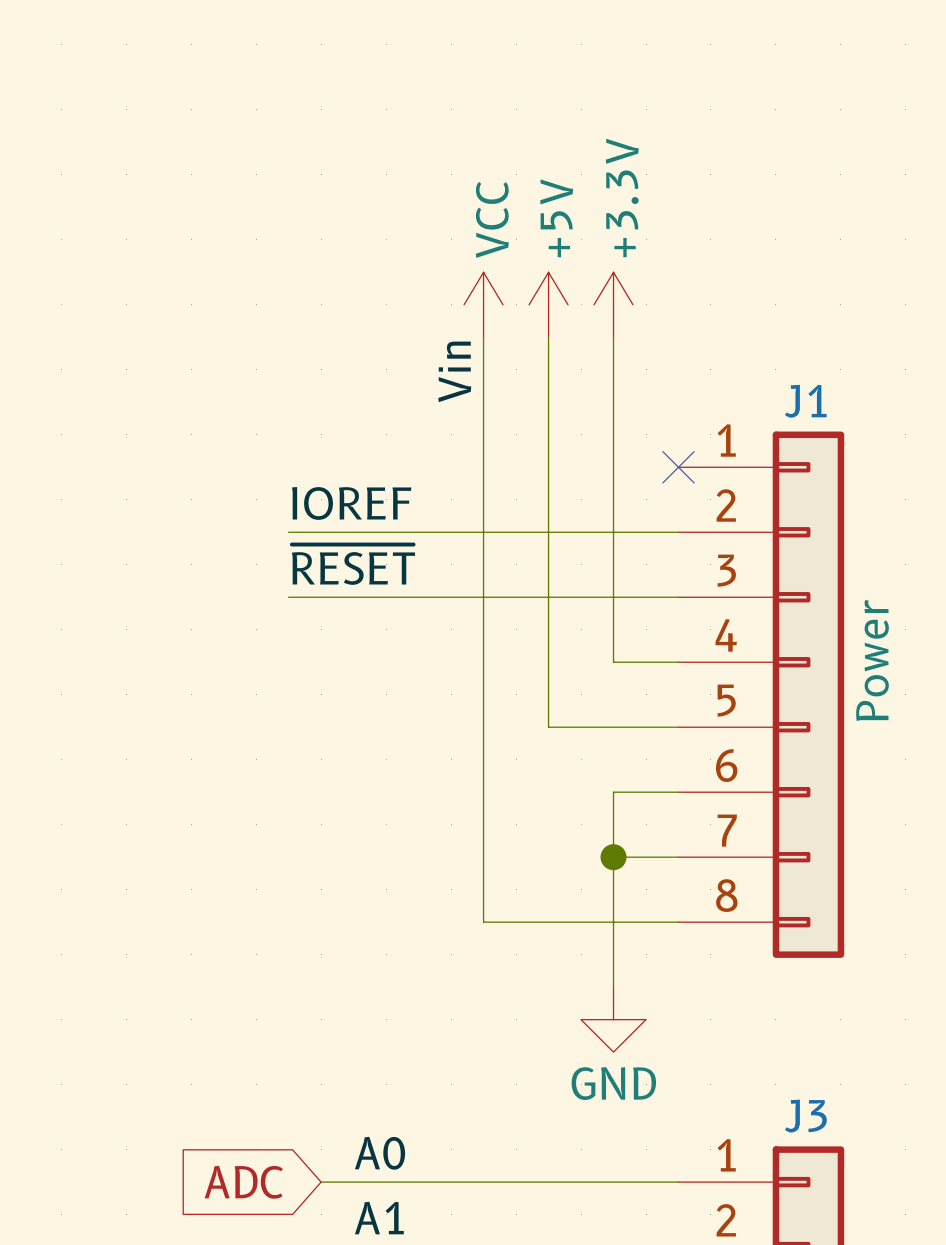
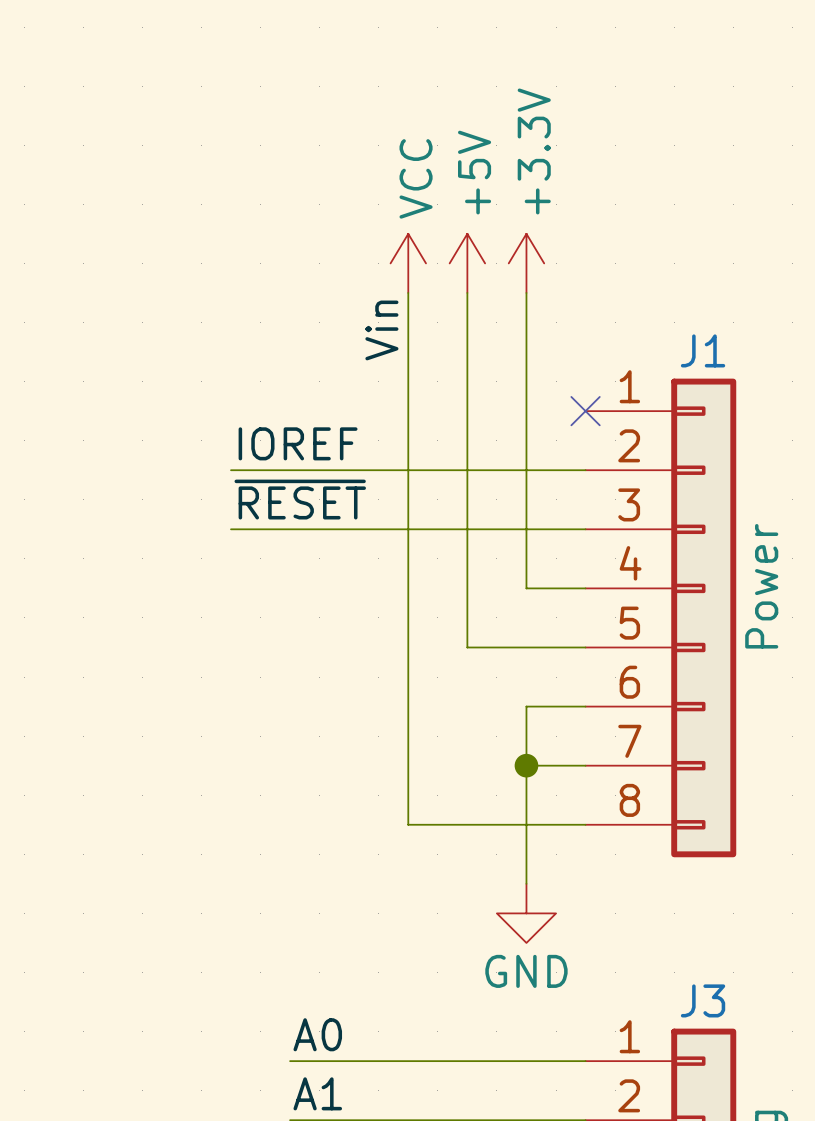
global label: ADC (243, 1182) -> none
wire: (321, 1182) (353, 1182) -> none

